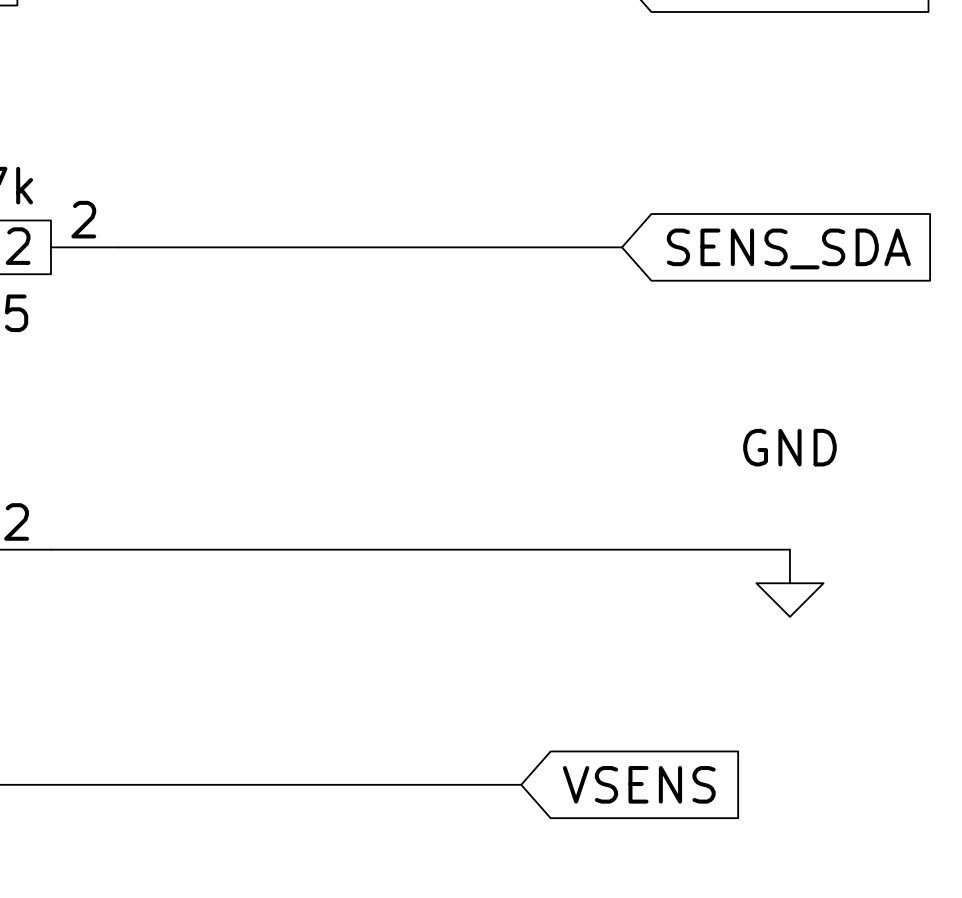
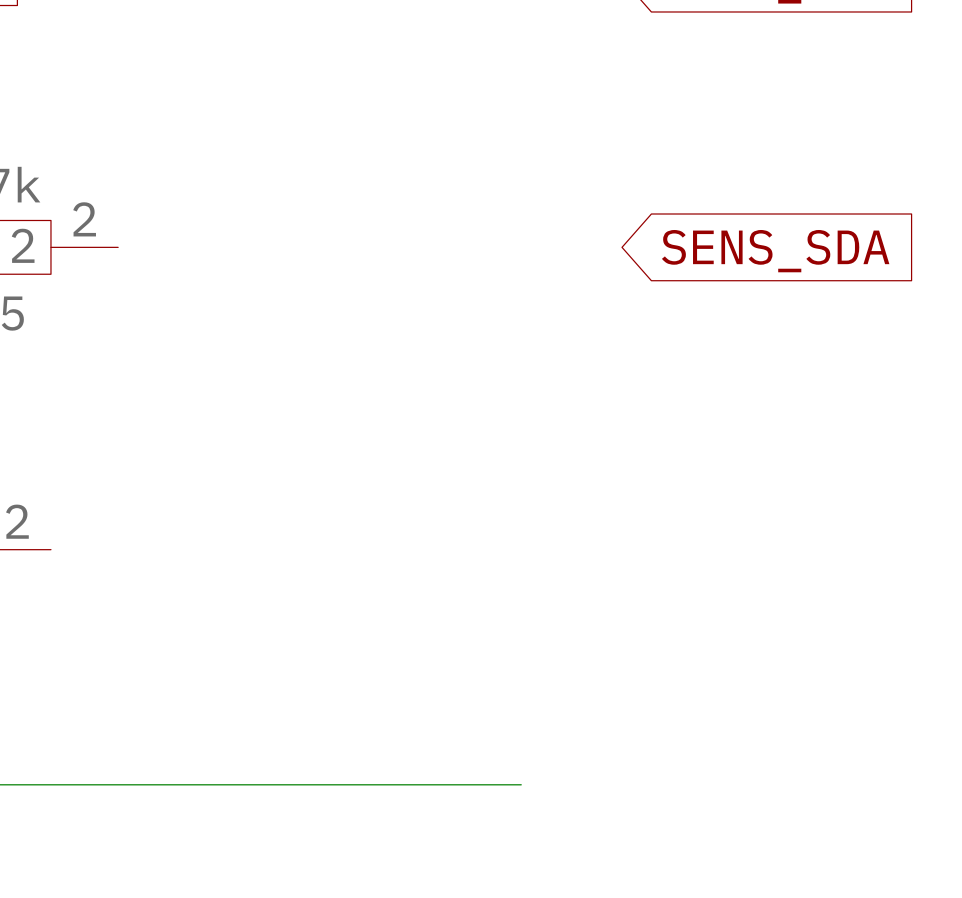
wire: (118, 247) (622, 247) -> none
wire: (50, 549) (789, 549) -> none
power symbol: GND (789, 583) -> none
global label: VSENS (639, 784) -> none

